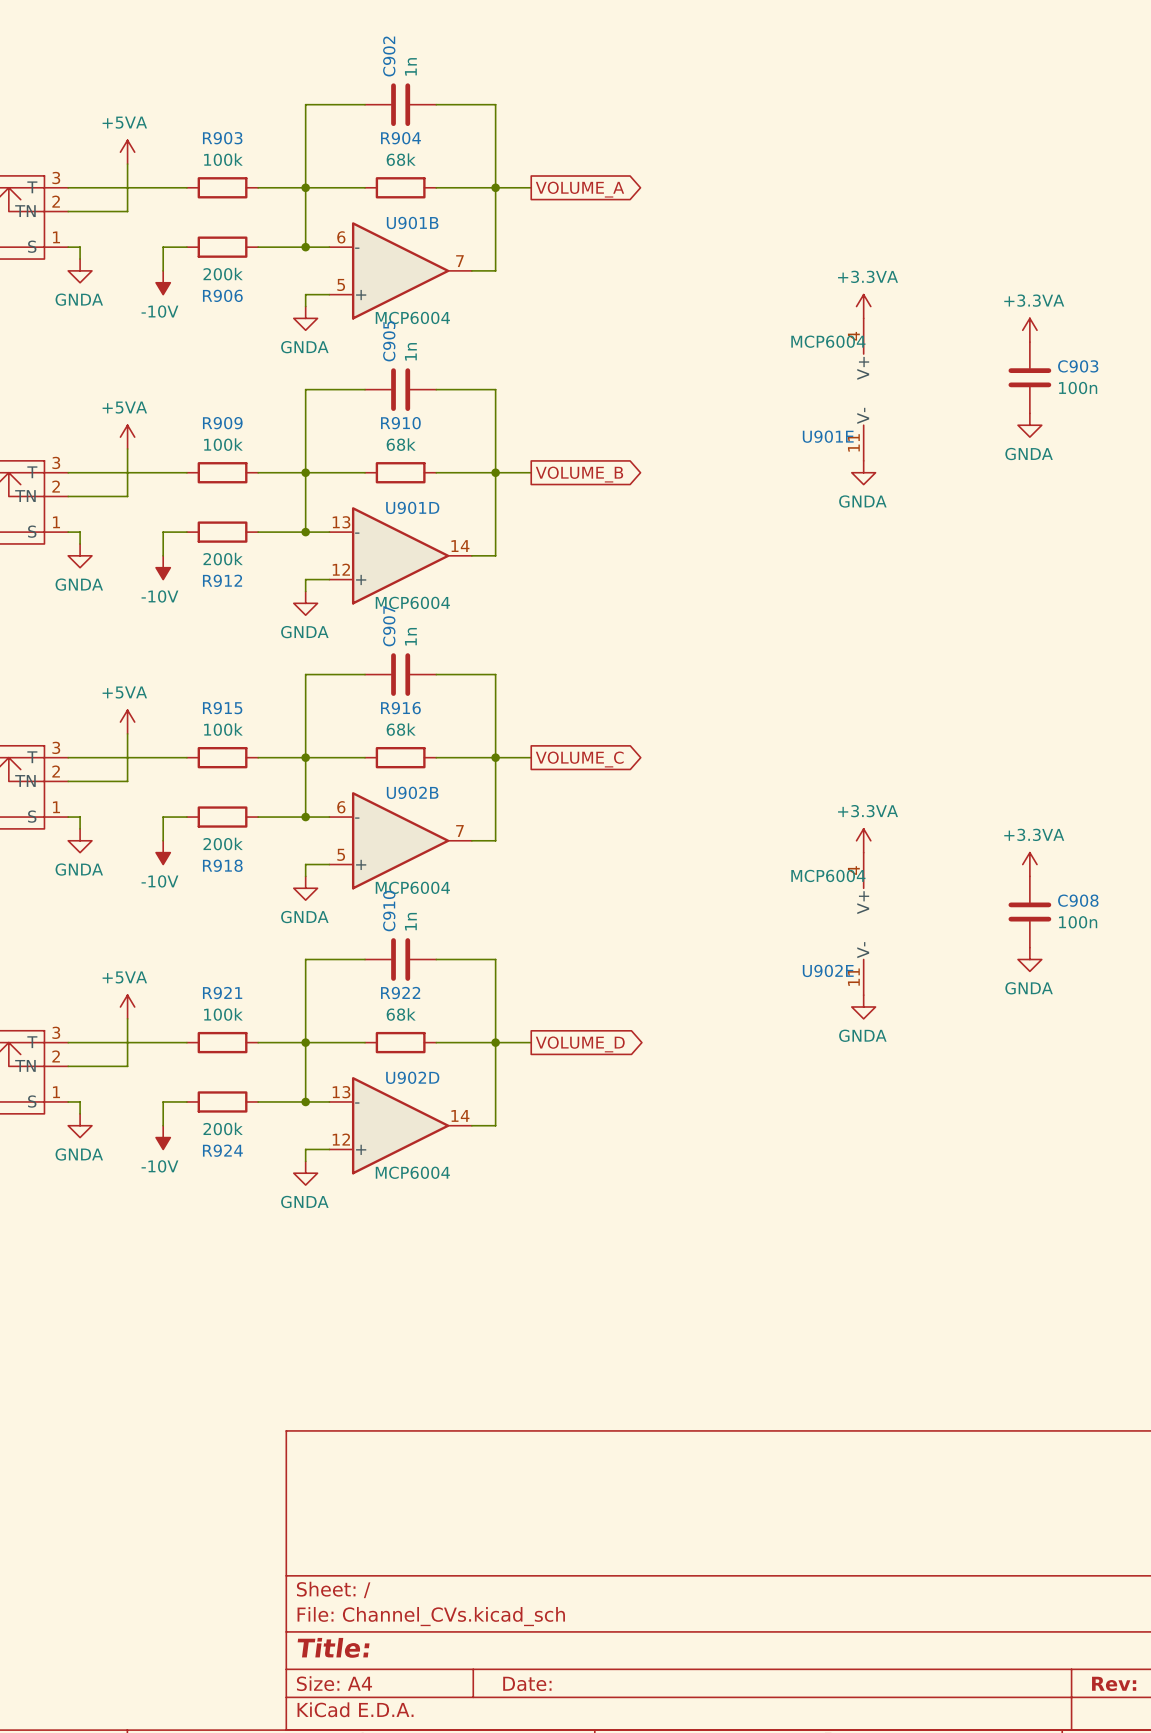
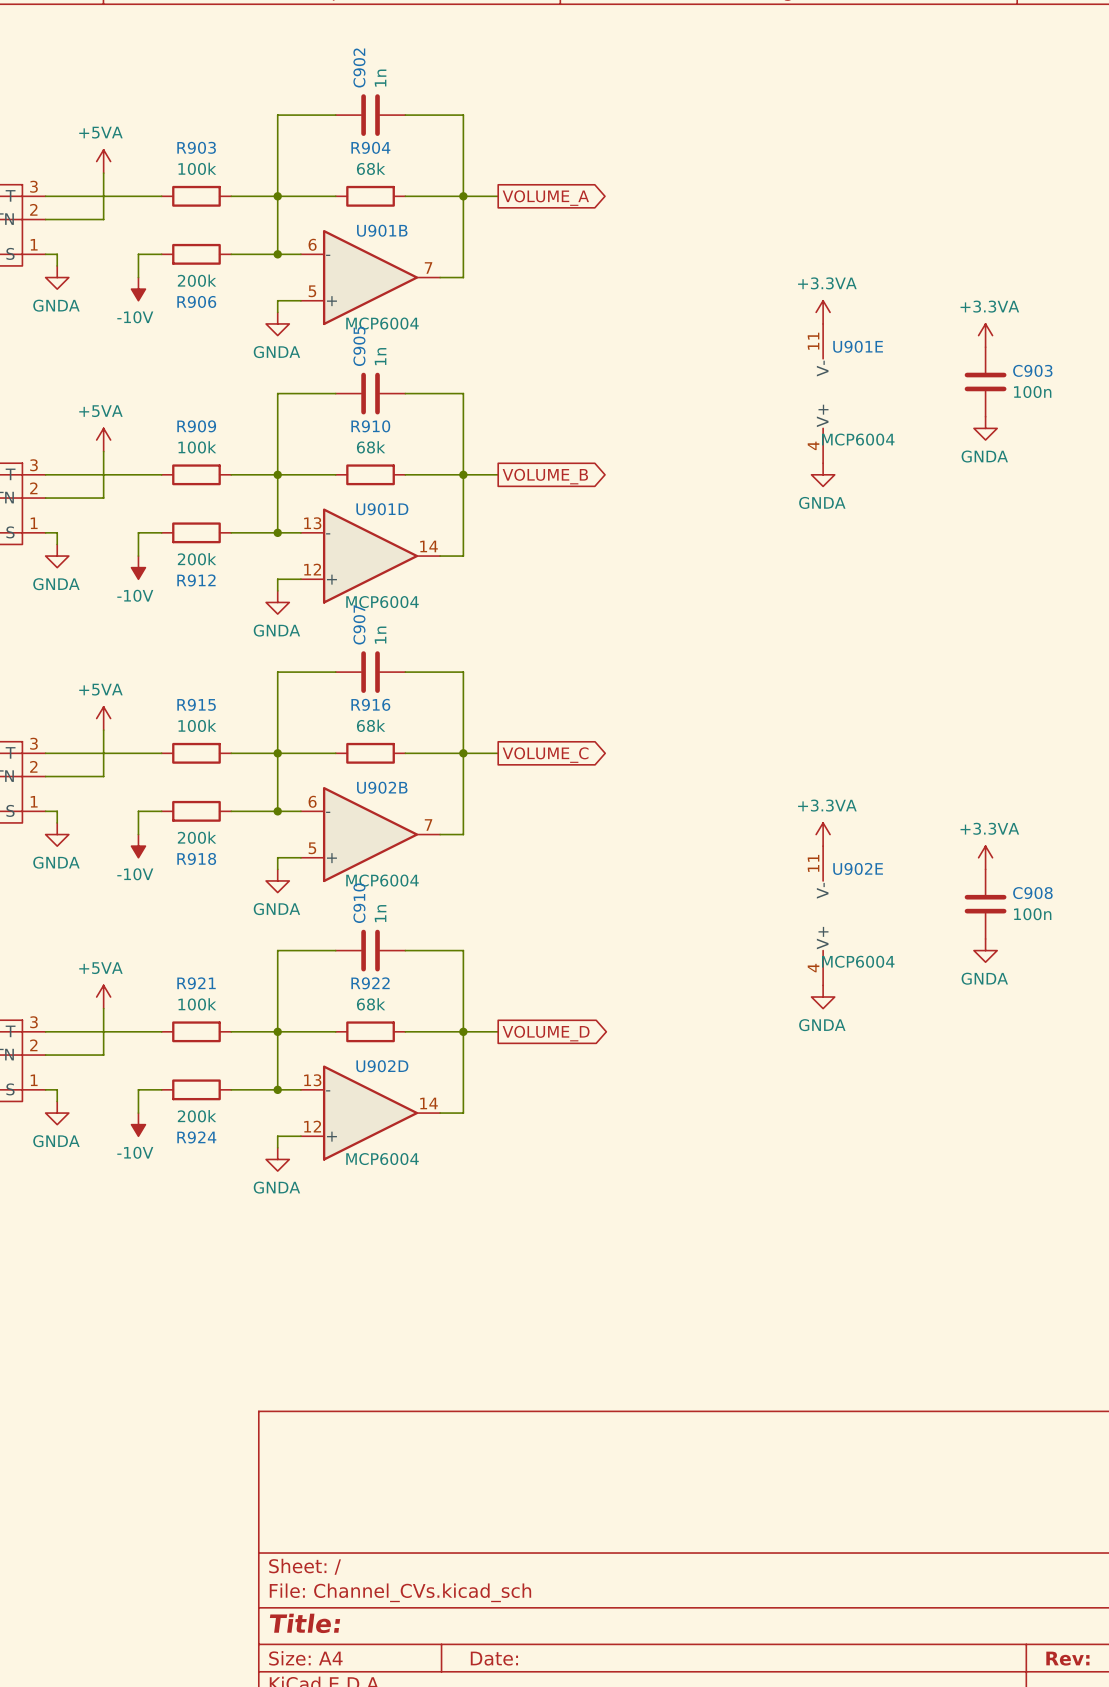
U901E rotation: 0° (863, 389) -> 180° (823, 393)
U902E rotation: 0° (863, 923) -> 180° (823, 915)

